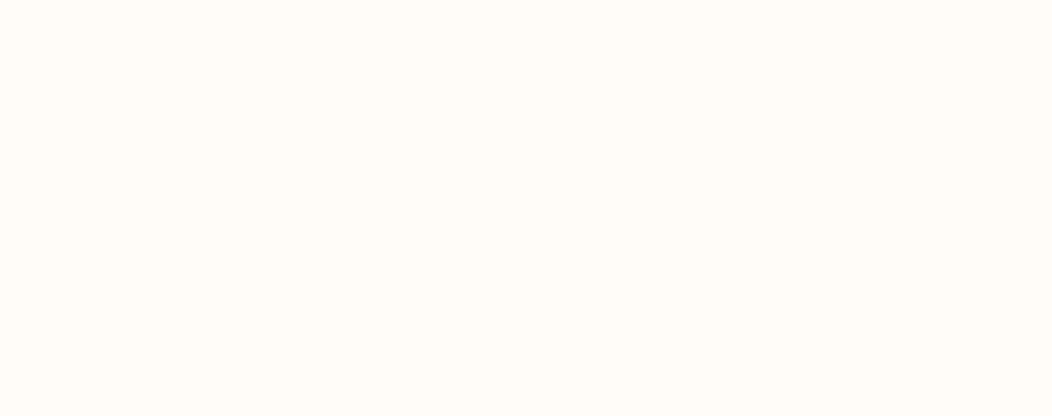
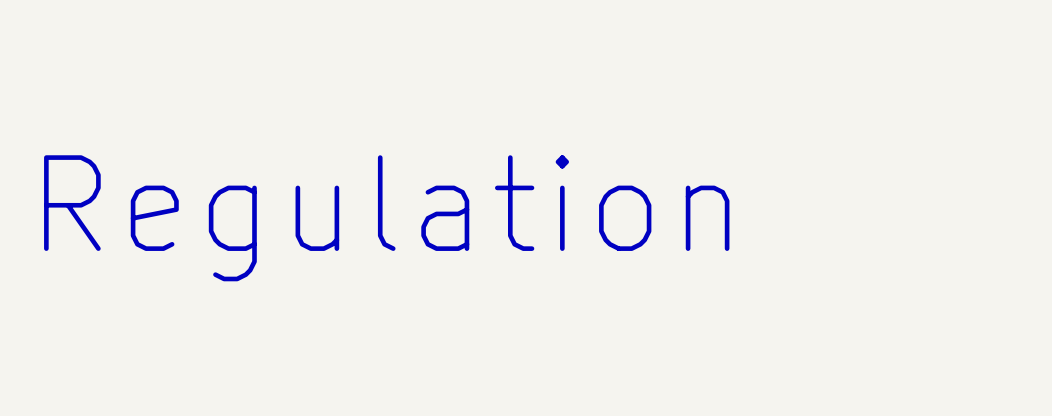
text: none -> Regulation (386, 218)

